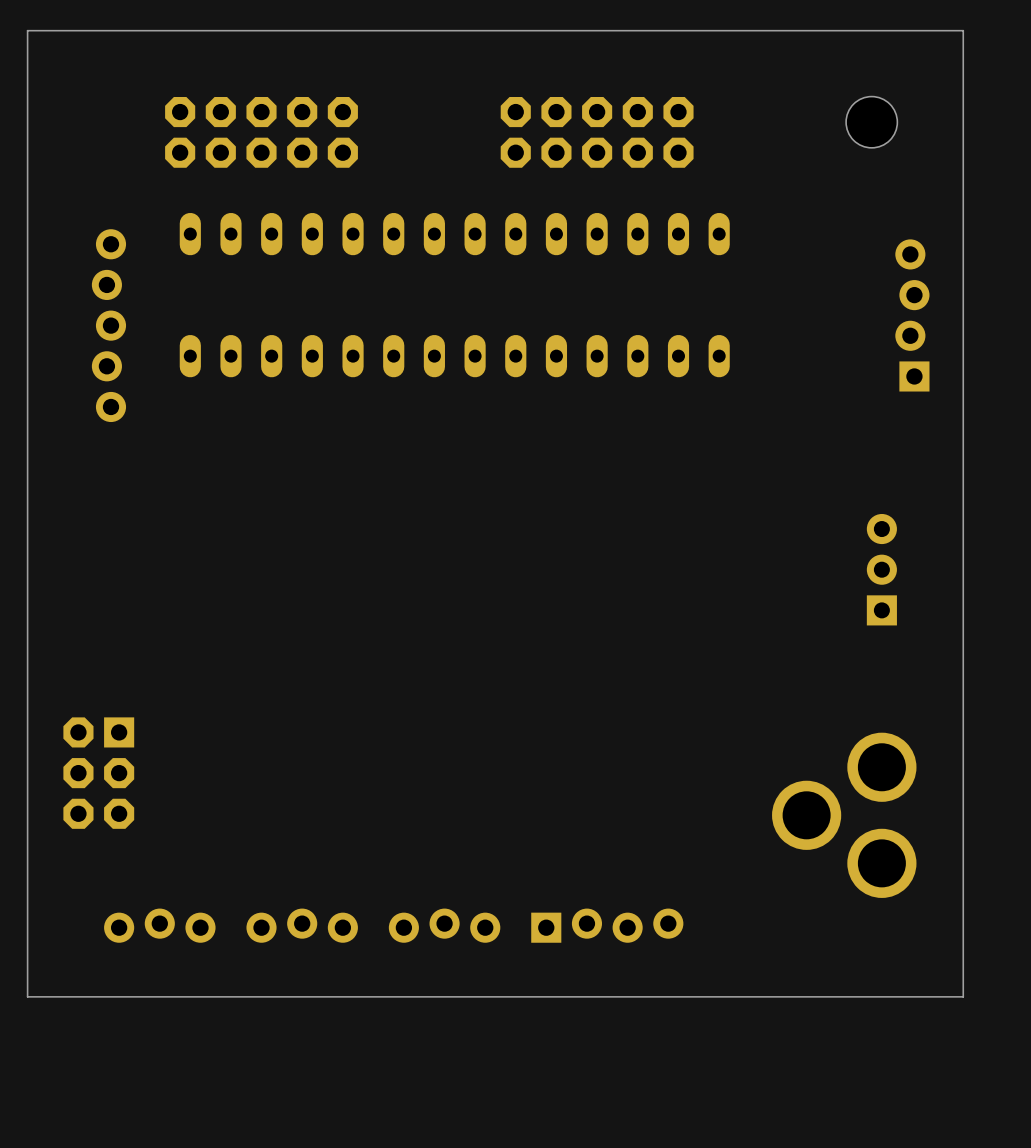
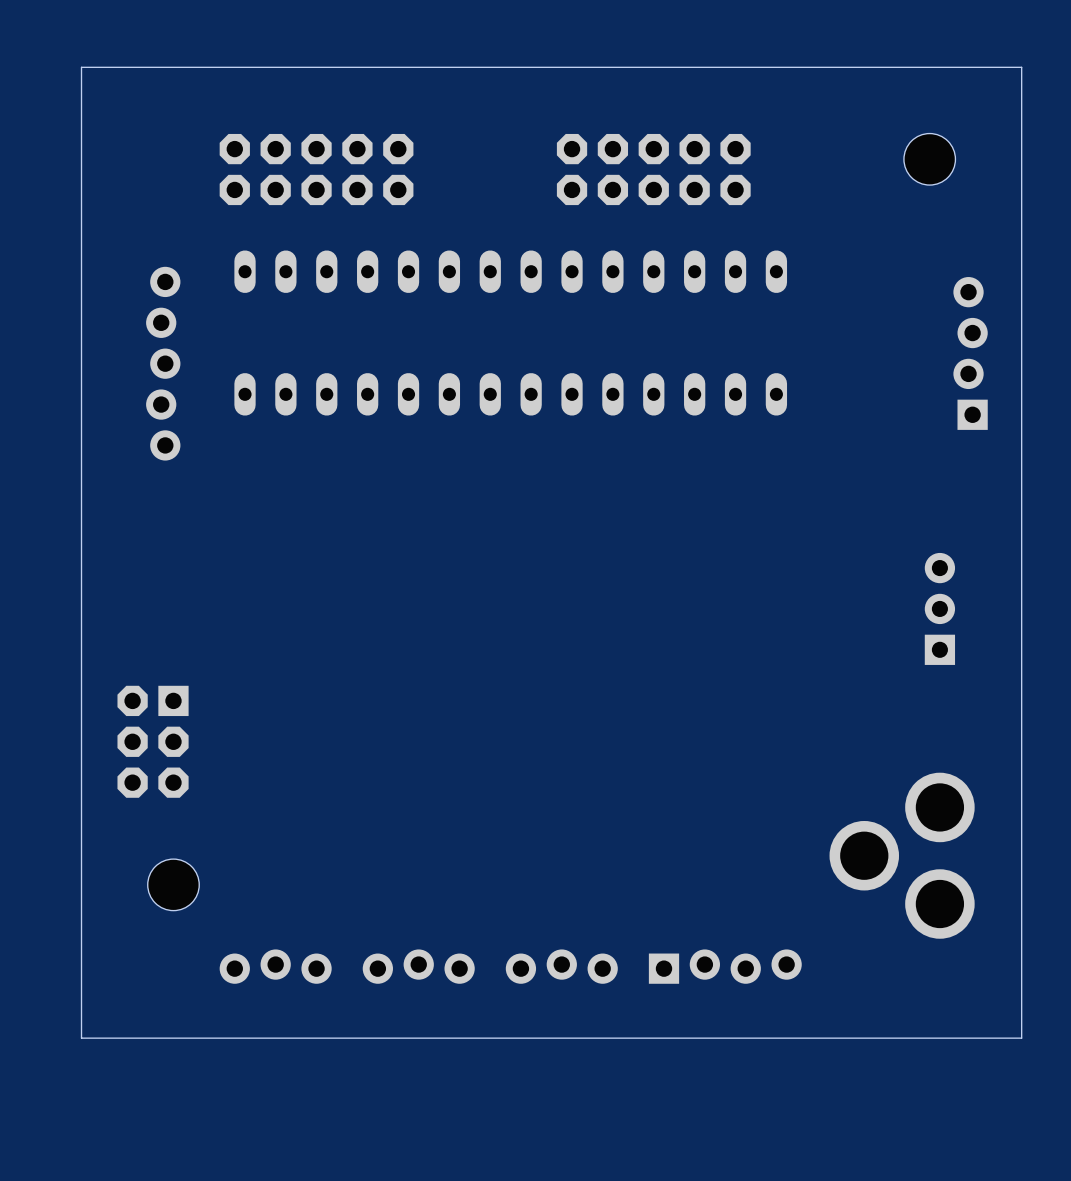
part position: (98, 773) -> (153, 741)
part: none -> (173, 884)
part: (159, 925) -> none
part: none -> (275, 966)
part: (302, 925) -> none
part: none -> (418, 966)
part: (444, 925) -> none
part: none -> (561, 966)
part position: (607, 925) -> (725, 966)

